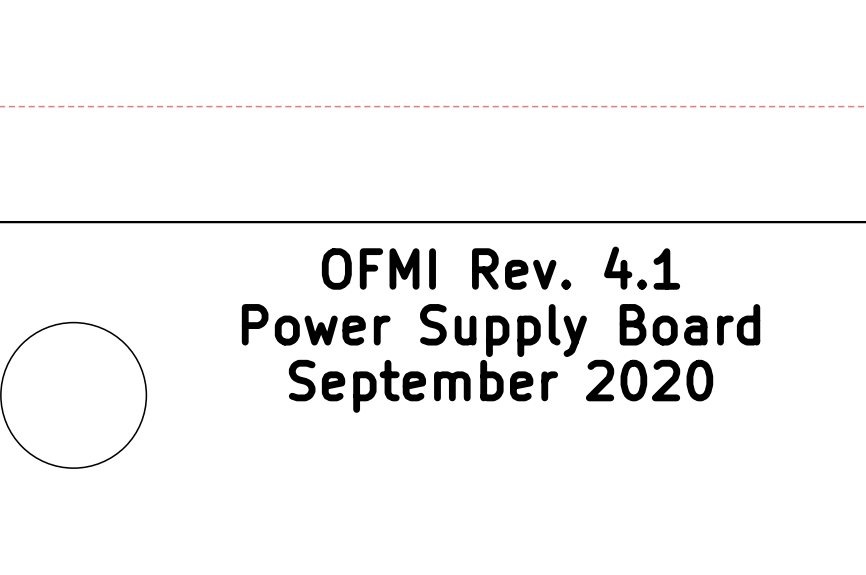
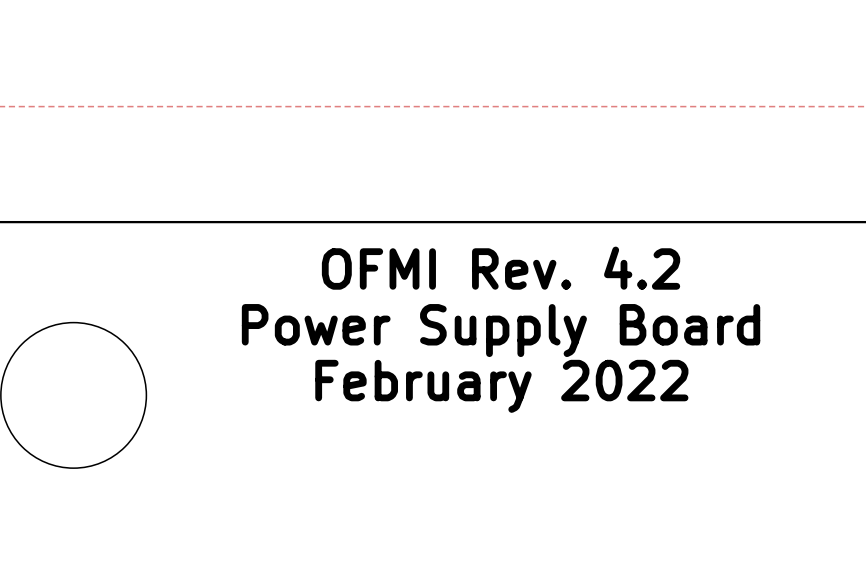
text: OFMI Rev. 4.1 (501, 268) -> OFMI Rev. 4.2 (501, 268)
text: September 2020 (501, 386) -> February 2022 (501, 386)

